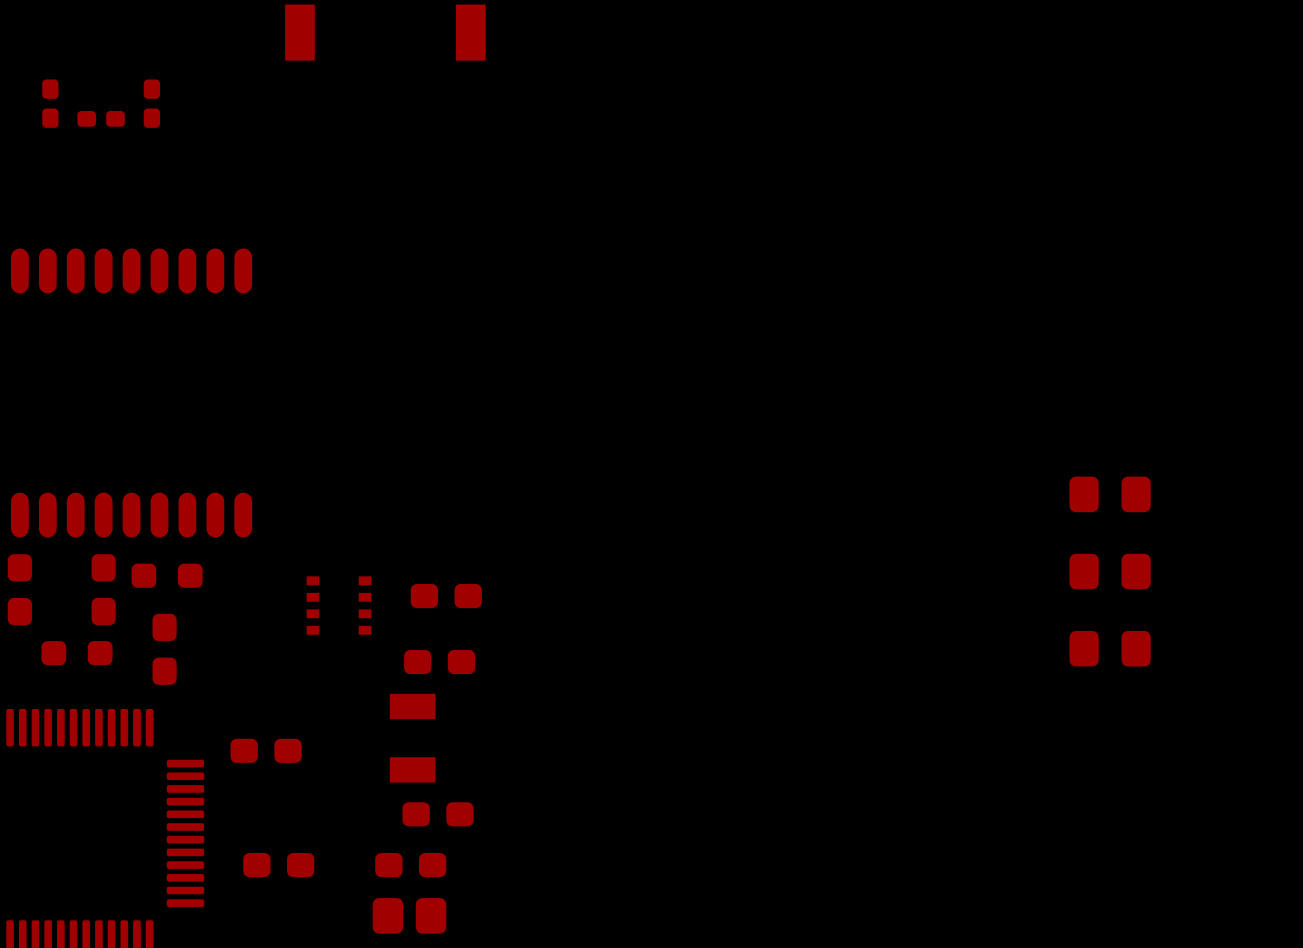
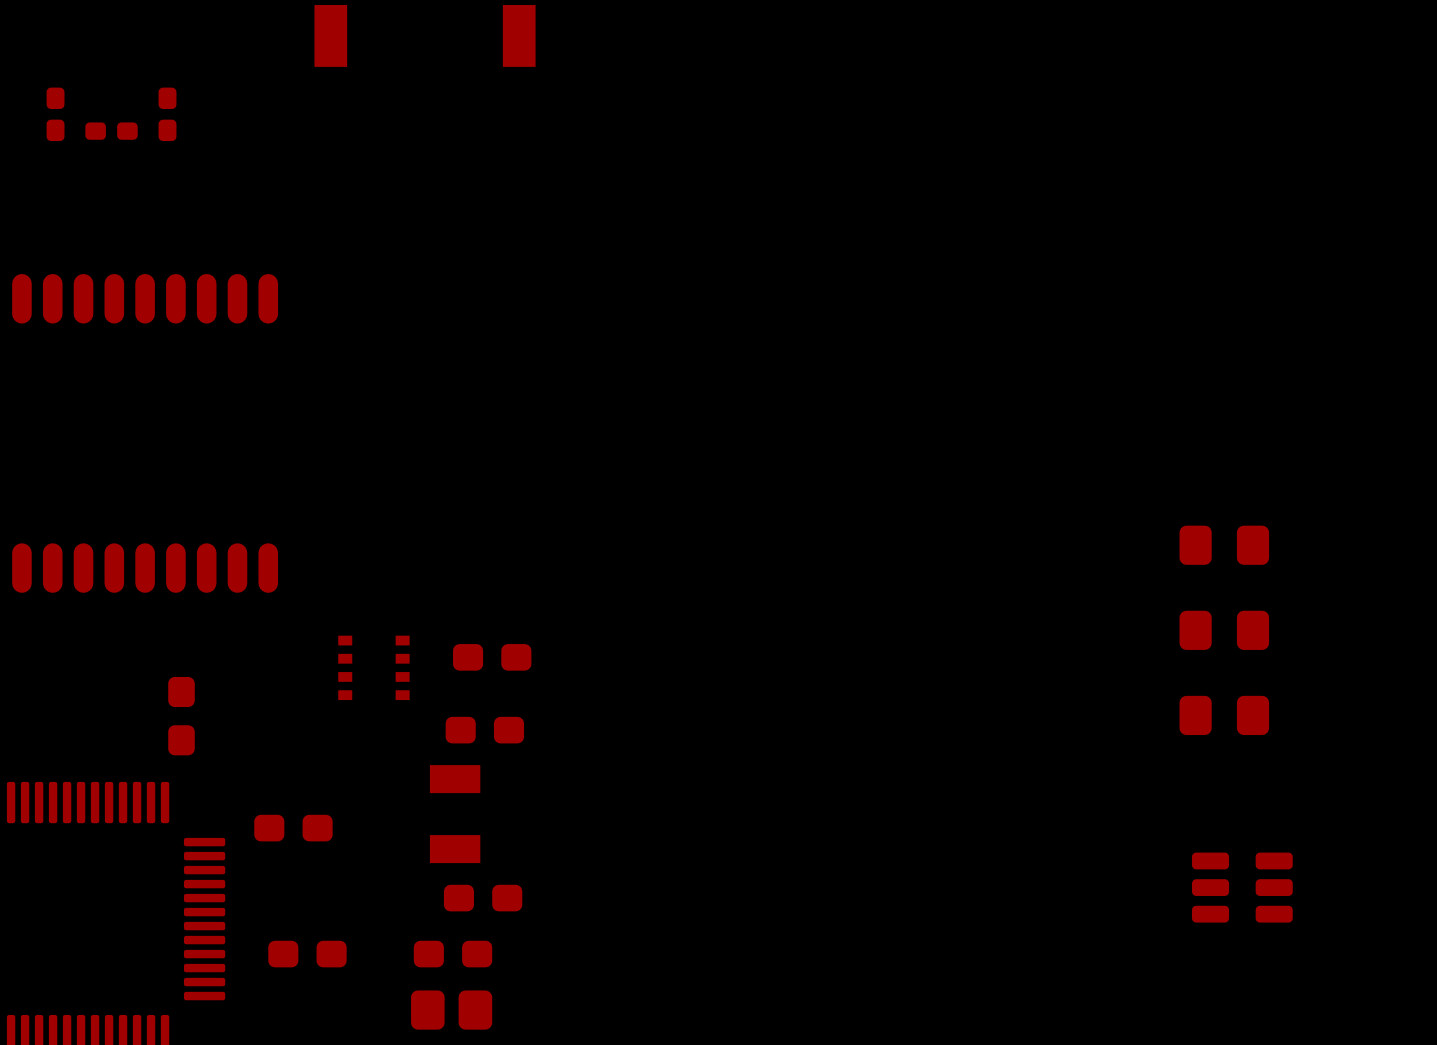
part: (167, 575) -> none
part: (19, 589) -> none
part: (103, 589) -> none
part: (77, 653) -> none
part: none -> (1242, 887)

